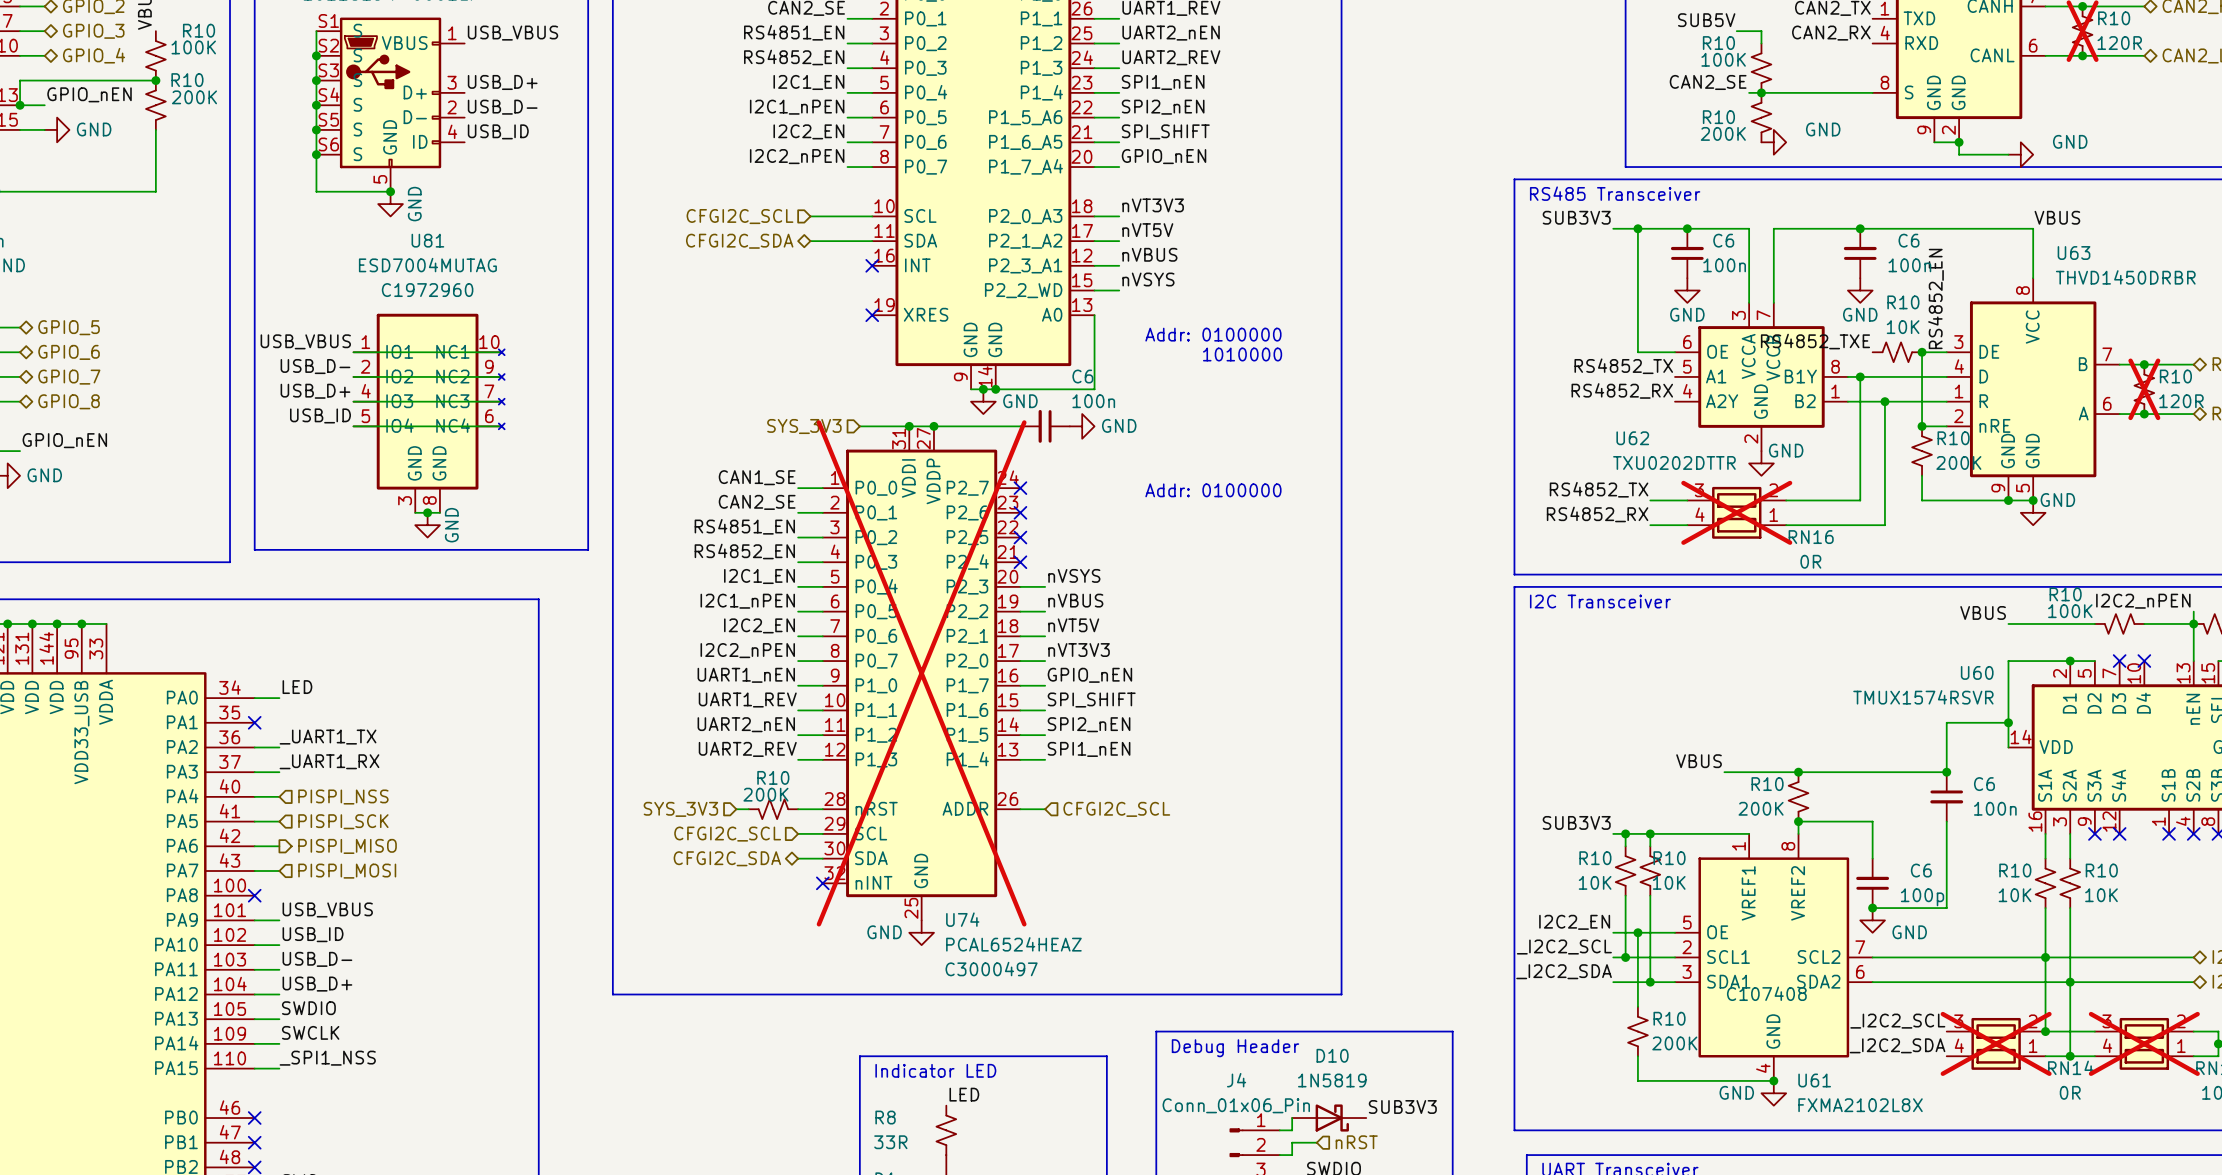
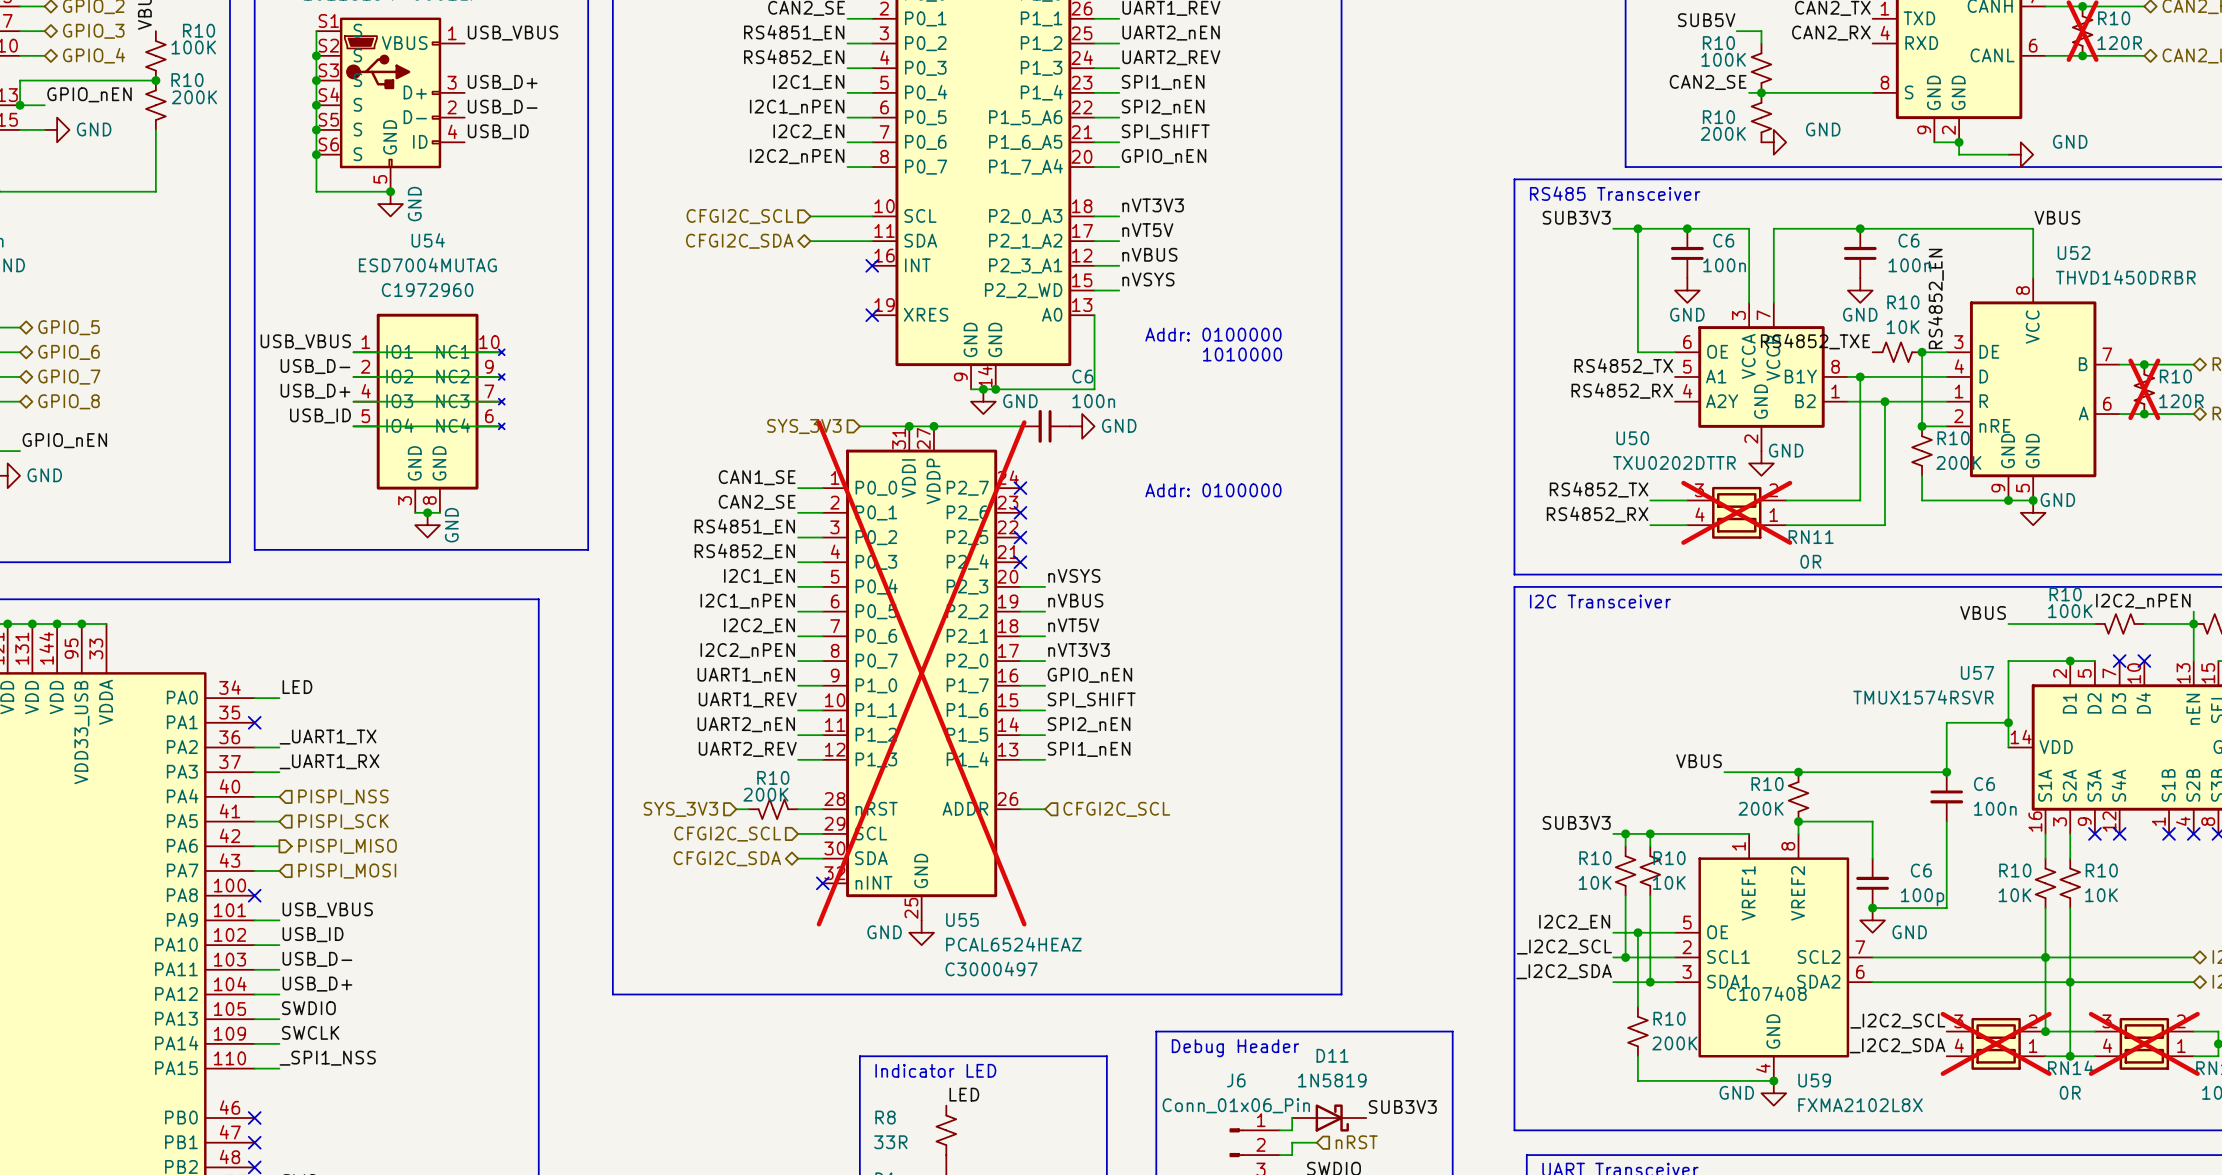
U81 name: U81 (427, 240) -> U54 (428, 240)
U63 name: U63 (2074, 253) -> U52 (2074, 253)
U62 name: U62 (1632, 438) -> U50 (1632, 438)
RN16 name: RN16 (1811, 537) -> RN11 (1811, 537)
U60 name: U60 (1977, 672) -> U57 (1977, 672)
U74 name: U74 (962, 919) -> U55 (962, 919)
D10 name: D10 (1332, 1055) -> D11 (1332, 1055)
J4 name: J4 (1236, 1080) -> J6 (1236, 1080)
U61 name: U61 (1814, 1080) -> U59 (1814, 1080)

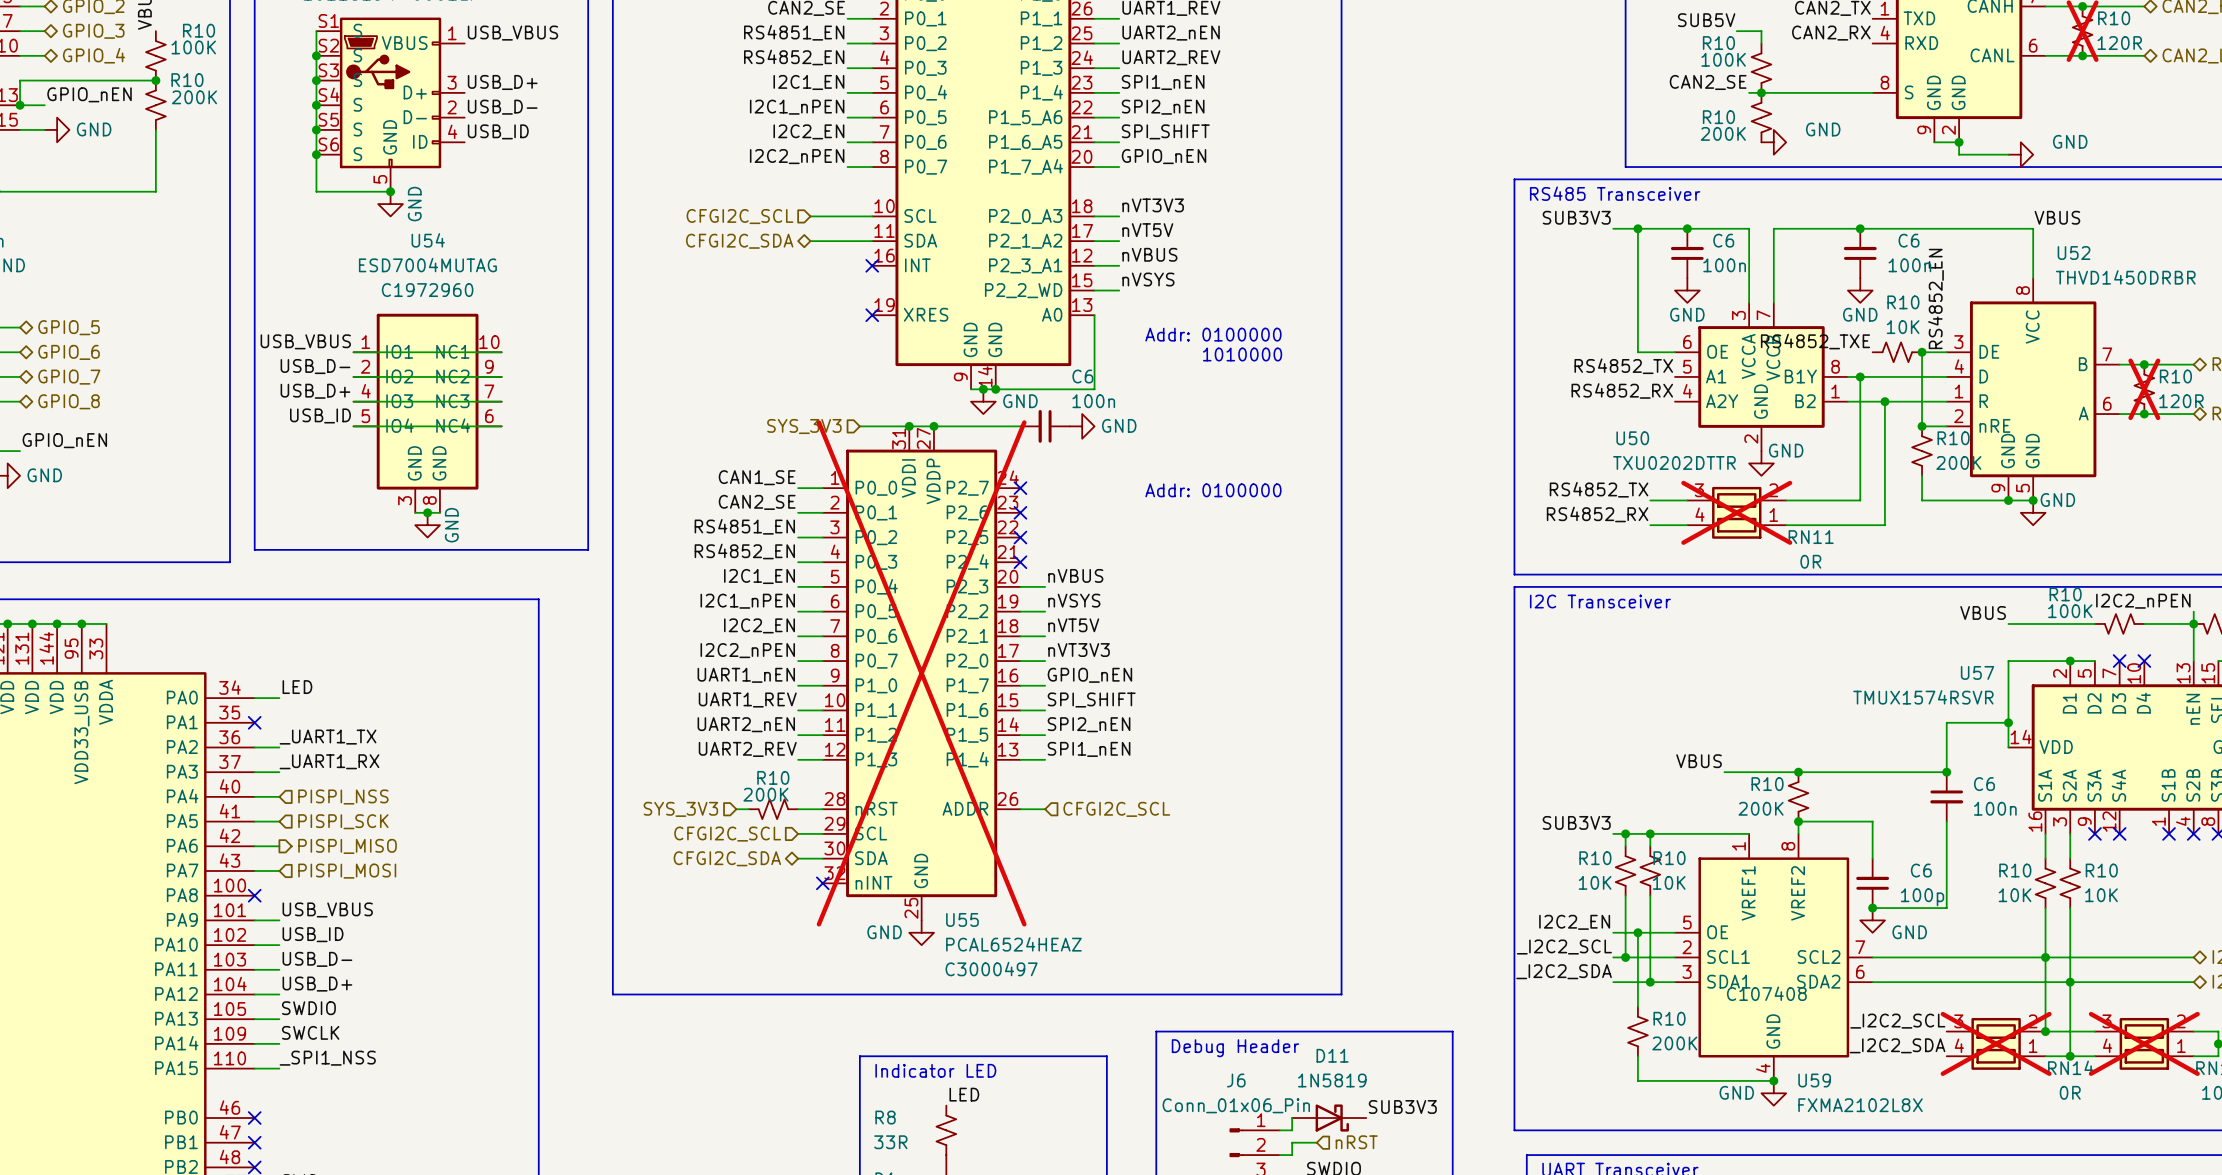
U54 symbol: [353, 313, 505, 513] -> [353, 313, 502, 513]
label: nVSYS (1074, 575) -> nVBUS (1075, 575)
label: nVBUS (1075, 600) -> nVSYS (1074, 600)

